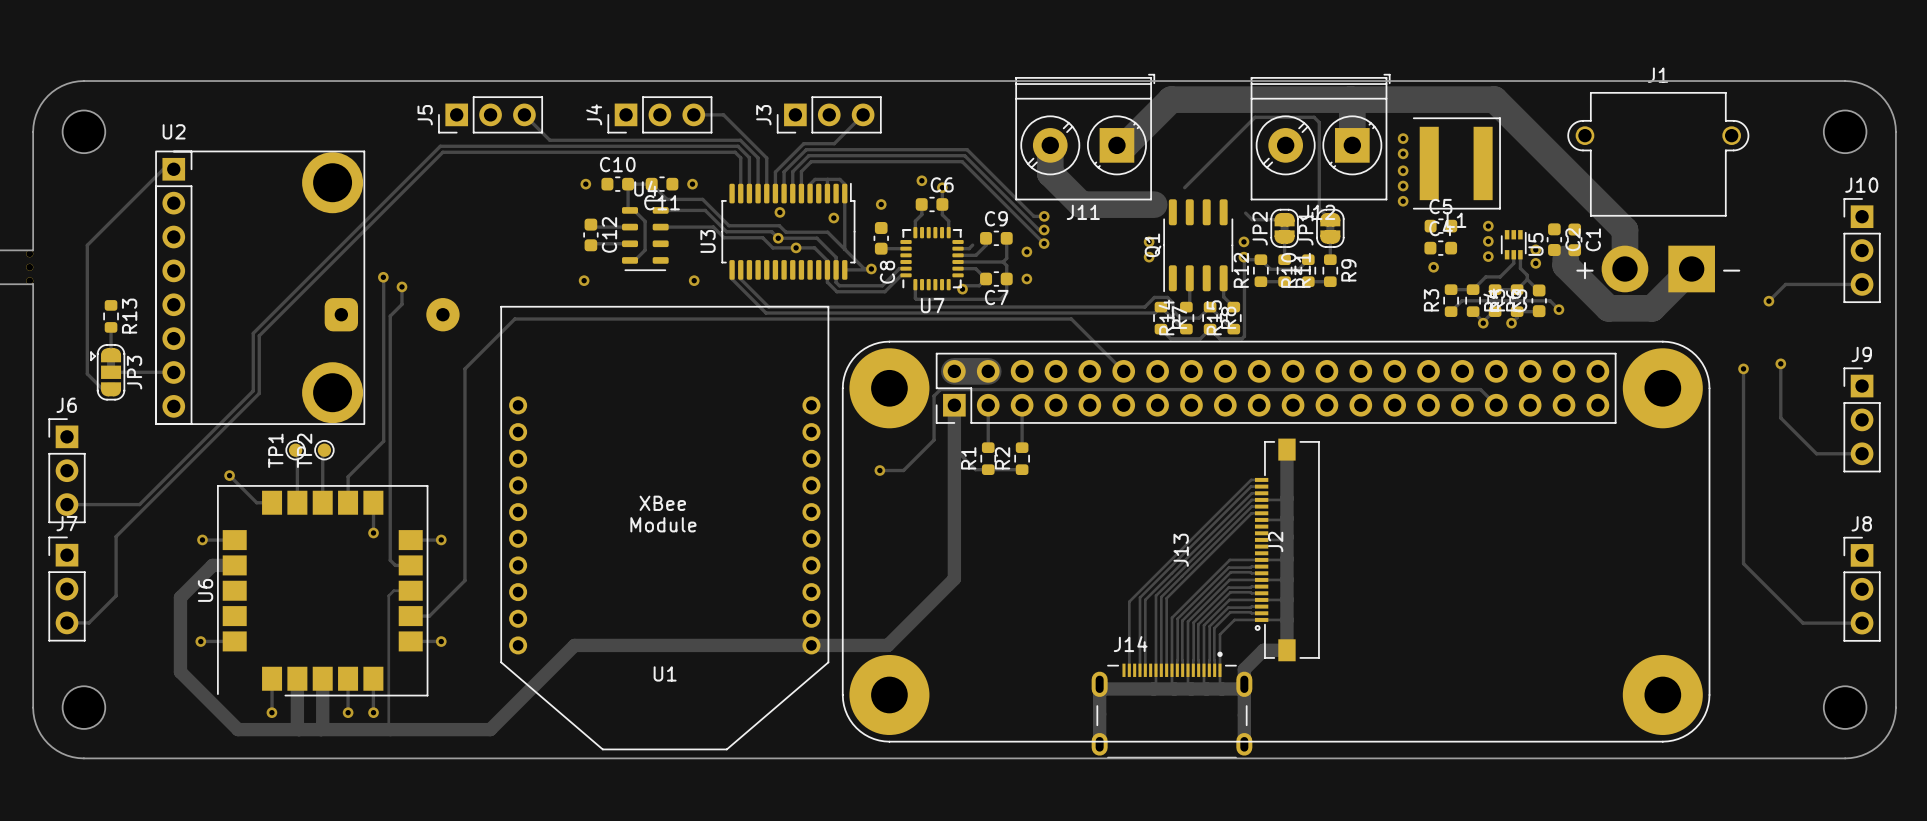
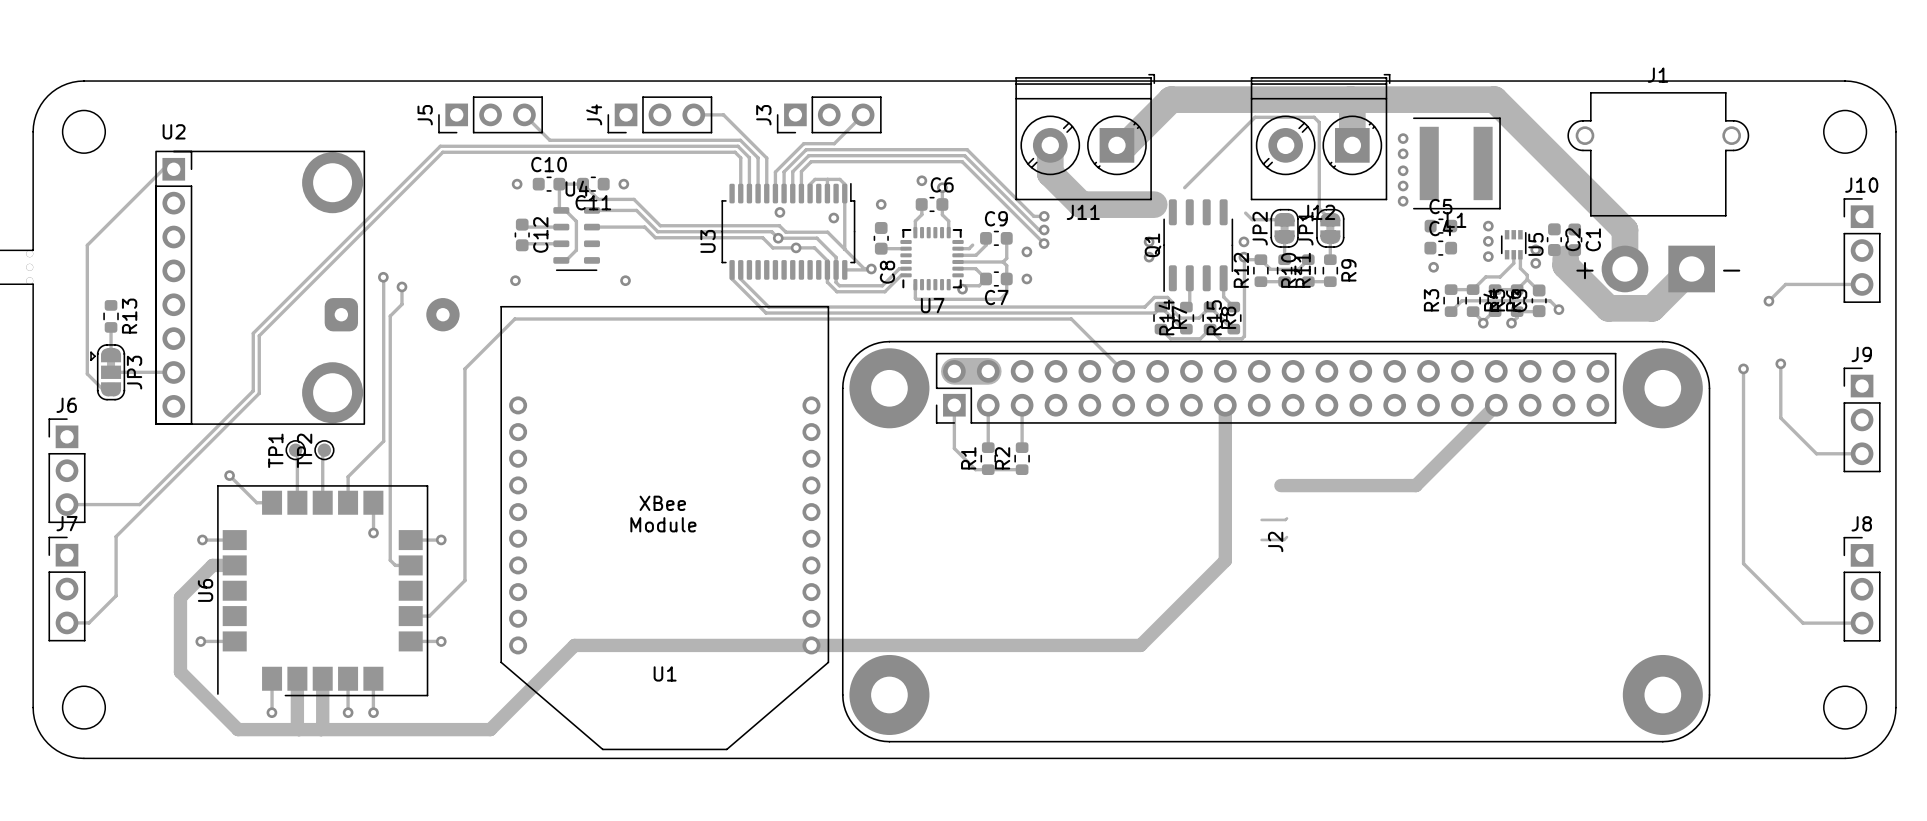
via: none -> (517, 184)
via: (585, 184) -> none
C10 position: (617, 184) -> (549, 184)
via: none -> (623, 184)
C11 position: (662, 184) -> (593, 184)
via: (692, 184) -> none
track: (630, 210) (628, 208) (628, 184) (651, 184) (666, 199) (702, 199) (729, 225) -> (561, 210) (559, 208) (559, 184) (583, 184) (598, 199) (633, 199) (660, 225) (729, 225)
track: (634, 210) (645, 221) (645, 250) (634, 260) -> (565, 210) (576, 221) (576, 250) (566, 260)
track: (660, 210) (705, 210) (726, 231) -> (591, 210) (636, 210) (657, 231) (726, 231)
track: none -> (524, 227) (561, 227)
track: (660, 227) (713, 227) (724, 237) -> (630, 227) (644, 227) (655, 237) (724, 237)
C12 position: (590, 234) -> (522, 234)
U4 position: (645, 235) -> (576, 235)
track: (592, 243) (630, 243) -> (523, 243) (561, 243)
via: none -> (515, 280)
via: (584, 280) -> none
via: none -> (625, 280)
via: (694, 280) -> none
track: (954, 405) (954, 578) (887, 645) -> (1225, 405) (1225, 560) (1140, 645) (887, 645)
track: (1496, 405) (1480, 389) (940, 389) (934, 396) (934, 440) (903, 470) (879, 470) -> (1496, 405) (1415, 485) (1280, 485)
track: (1286, 449) (1286, 650) (1263, 650) (1244, 669) (1244, 744) -> none
via: (879, 470) -> none
track: (1261, 479) (1251, 479) (1129, 601) (1129, 670) -> none
track: (1261, 486) (1251, 486) (1139, 597) (1139, 670) -> none
track: (1261, 493) (1251, 493) (1145, 599) (1145, 670) -> none
track: (1286, 498) (1251, 499) (1155, 595) (1155, 686) (1153, 688) -> none
track: (1261, 506) (1251, 506) (1161, 597) (1161, 670) -> none
track: (1261, 513) (1251, 513) (1166, 598) (1166, 670) -> none
J13: (1287, 549) -> none
track: (1286, 559) (1229, 559) (1171, 617) (1171, 686) (1174, 688) -> none
track: (1261, 566) (1228, 567) (1177, 618) (1177, 670) -> none
track: (1261, 573) (1230, 572) (1182, 620) (1182, 670) -> none
track: (1286, 579) (1229, 579) (1187, 621) (1187, 685) (1191, 688) -> none
track: (1261, 586) (1228, 587) (1193, 622) (1193, 670) -> none
track: (410, 590) (393, 590) (388, 595) (388, 727) (390, 729) -> none
track: (1261, 593) (1230, 592) (1198, 624) (1198, 670) -> none
track: (1286, 599) (1229, 599) (1203, 625) (1203, 686) (1206, 688) -> none
track: (1261, 606) (1228, 607) (1209, 626) (1209, 670) -> none
track: (1261, 613) (1230, 612) (1214, 628) (1214, 670) -> none
track: (1286, 619) (1234, 619) (1219, 634) (1219, 687) (1221, 688) -> none
track: (1244, 684) (1239, 688) (1104, 688) (1099, 684) (1099, 744) -> none
J14: (1171, 705) -> none

